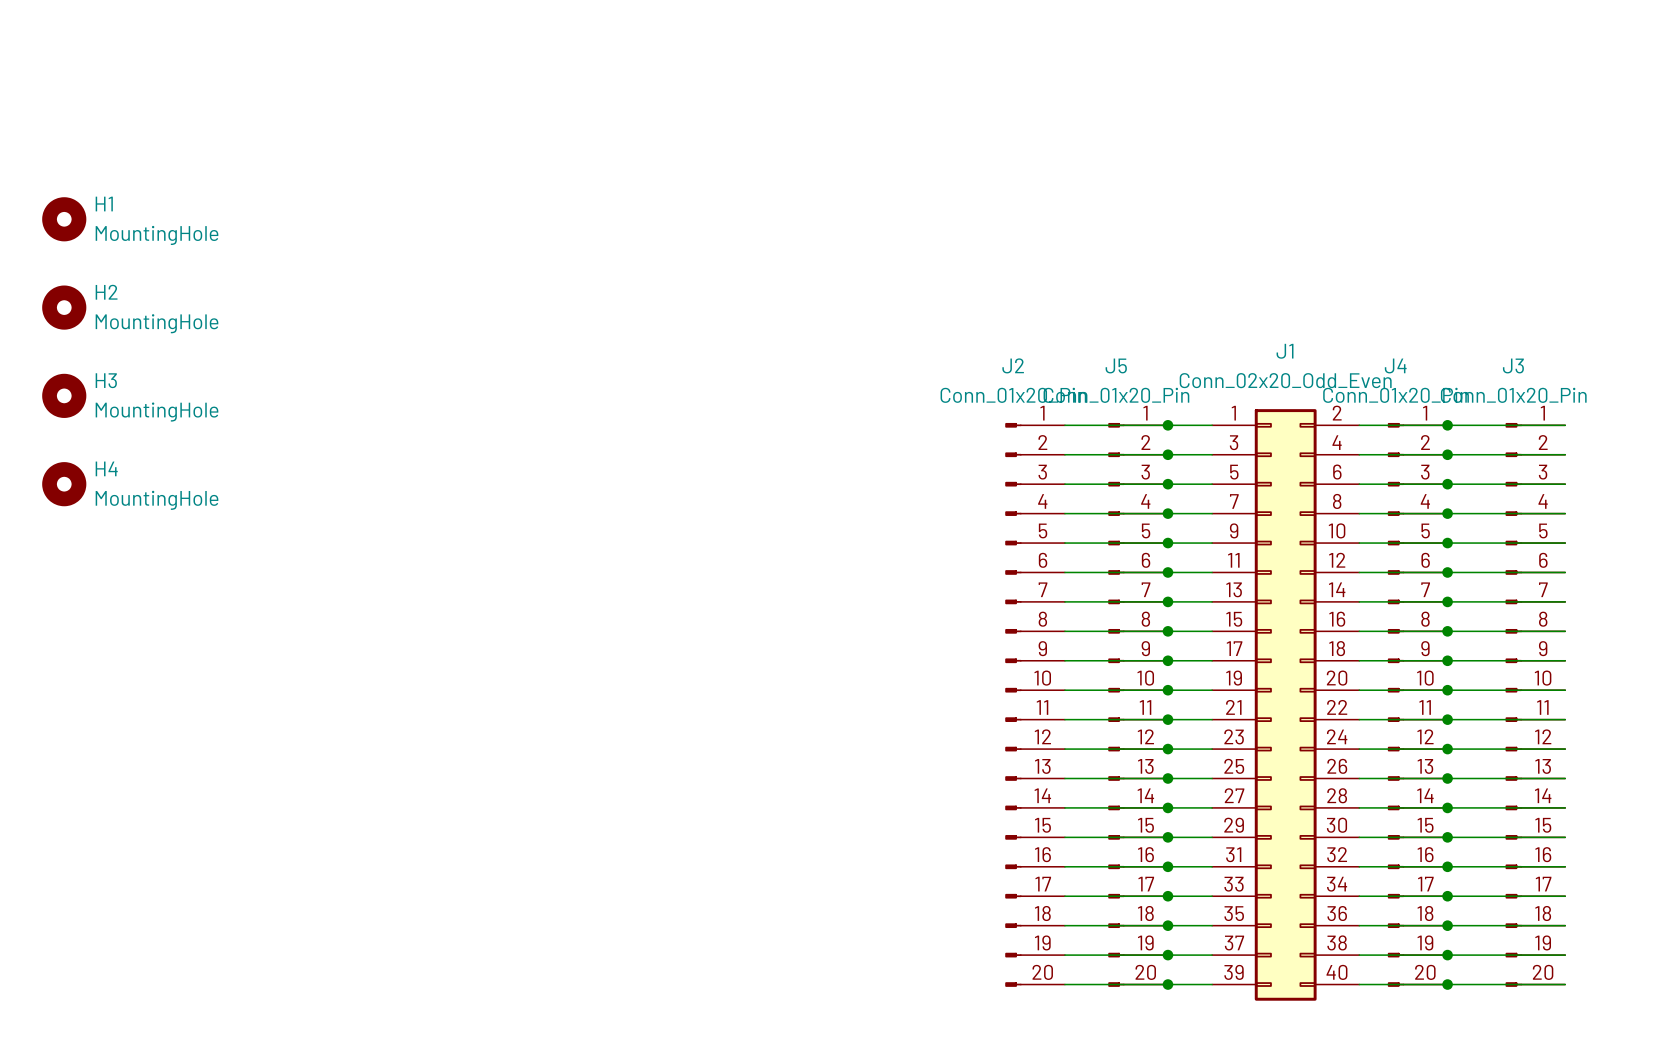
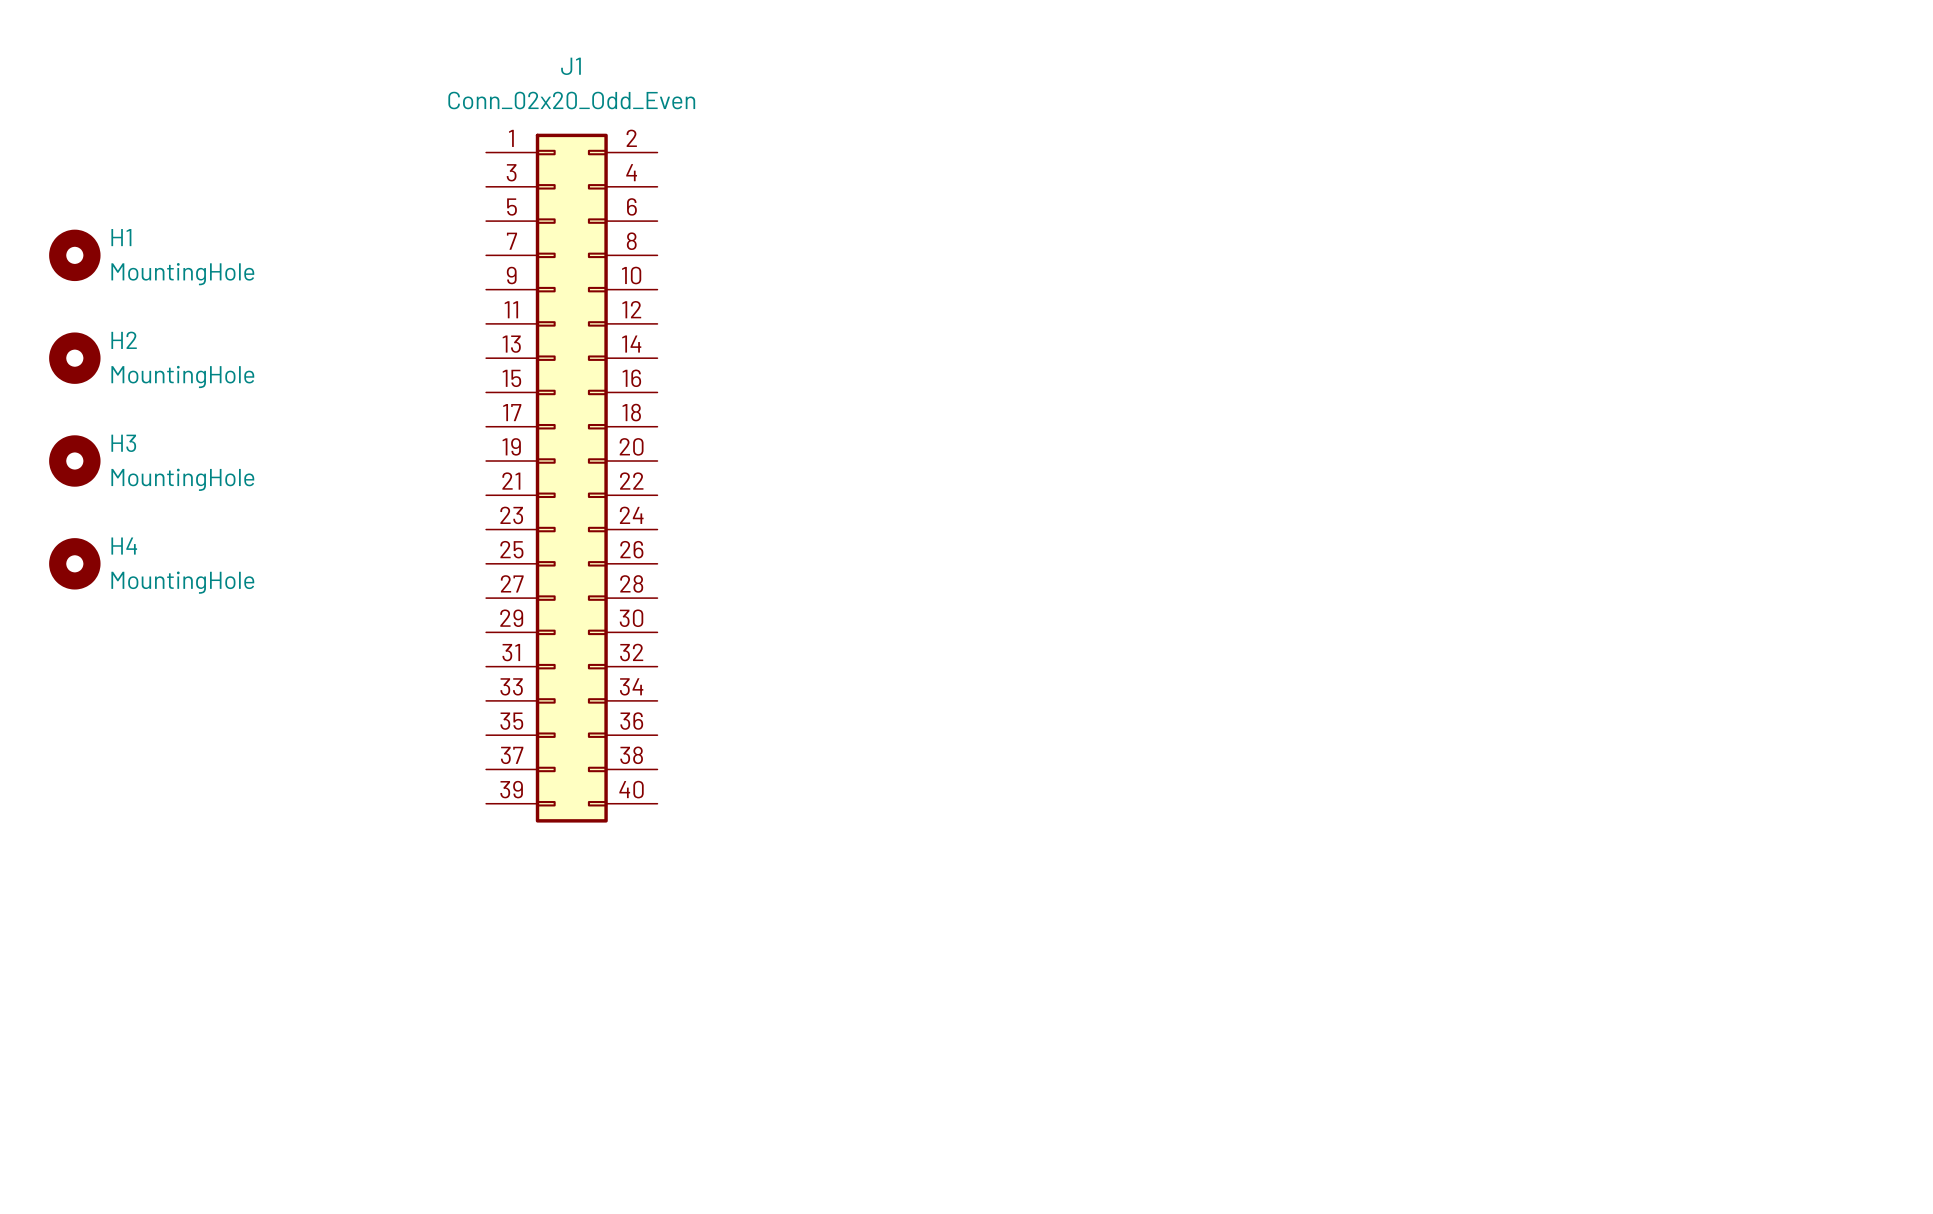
wire: (1064, 425) (1212, 425) -> none
junction: (1167, 425) -> none
wire: (1359, 425) (1565, 425) -> none
junction: (1447, 425) -> none
wire: (1064, 454) (1212, 454) -> none
junction: (1167, 454) -> none
wire: (1359, 454) (1565, 454) -> none
junction: (1447, 454) -> none
wire: (1064, 484) (1212, 484) -> none
junction: (1167, 484) -> none
wire: (1359, 484) (1565, 484) -> none
junction: (1447, 484) -> none
wire: (1064, 513) (1212, 513) -> none
junction: (1167, 513) -> none
wire: (1359, 513) (1565, 513) -> none
junction: (1447, 513) -> none
wire: (1064, 543) (1212, 543) -> none
junction: (1167, 543) -> none
wire: (1359, 543) (1565, 543) -> none
junction: (1447, 543) -> none
wire: (1064, 572) (1212, 572) -> none
junction: (1167, 572) -> none
wire: (1359, 572) (1565, 572) -> none
junction: (1447, 572) -> none
wire: (1064, 601) (1212, 601) -> none
junction: (1167, 601) -> none
wire: (1359, 601) (1565, 601) -> none
junction: (1447, 601) -> none
wire: (1064, 631) (1212, 631) -> none
junction: (1167, 631) -> none
wire: (1359, 631) (1565, 631) -> none
junction: (1447, 631) -> none
wire: (1064, 660) (1212, 660) -> none
junction: (1167, 660) -> none
wire: (1359, 660) (1565, 660) -> none
junction: (1447, 660) -> none
wire: (1064, 690) (1212, 690) -> none
junction: (1167, 690) -> none
wire: (1359, 690) (1565, 690) -> none
junction: (1447, 690) -> none
J2: Conn_01x20_Pin (1035, 704) -> none
J5: Conn_01x20_Pin (1138, 704) -> none
J1 position: (1285, 704) -> (571, 478)
J4: Conn_01x20_Pin (1417, 704) -> none
J3: Conn_01x20_Pin (1535, 704) -> none
wire: (1064, 719) (1212, 719) -> none
junction: (1167, 719) -> none
wire: (1359, 719) (1565, 719) -> none
junction: (1447, 719) -> none
wire: (1064, 749) (1212, 749) -> none
junction: (1167, 749) -> none
wire: (1359, 749) (1565, 749) -> none
junction: (1447, 749) -> none
wire: (1064, 778) (1212, 778) -> none
junction: (1167, 778) -> none
wire: (1359, 778) (1565, 778) -> none
junction: (1447, 778) -> none
wire: (1064, 807) (1212, 807) -> none
junction: (1167, 807) -> none
wire: (1359, 807) (1565, 807) -> none
junction: (1447, 807) -> none
wire: (1064, 837) (1212, 837) -> none
junction: (1167, 837) -> none
wire: (1359, 837) (1565, 837) -> none
junction: (1447, 837) -> none
wire: (1064, 866) (1212, 866) -> none
junction: (1167, 866) -> none
wire: (1359, 866) (1565, 866) -> none
junction: (1447, 866) -> none
wire: (1064, 896) (1212, 896) -> none
junction: (1167, 896) -> none
wire: (1359, 896) (1565, 896) -> none
junction: (1447, 896) -> none
wire: (1064, 925) (1212, 925) -> none
junction: (1167, 925) -> none
wire: (1359, 925) (1565, 925) -> none
junction: (1447, 925) -> none
wire: (1064, 955) (1212, 955) -> none
junction: (1167, 955) -> none
wire: (1359, 955) (1565, 955) -> none
junction: (1447, 955) -> none
wire: (1064, 984) (1212, 984) -> none
junction: (1167, 984) -> none
wire: (1359, 984) (1565, 984) -> none
junction: (1447, 984) -> none

